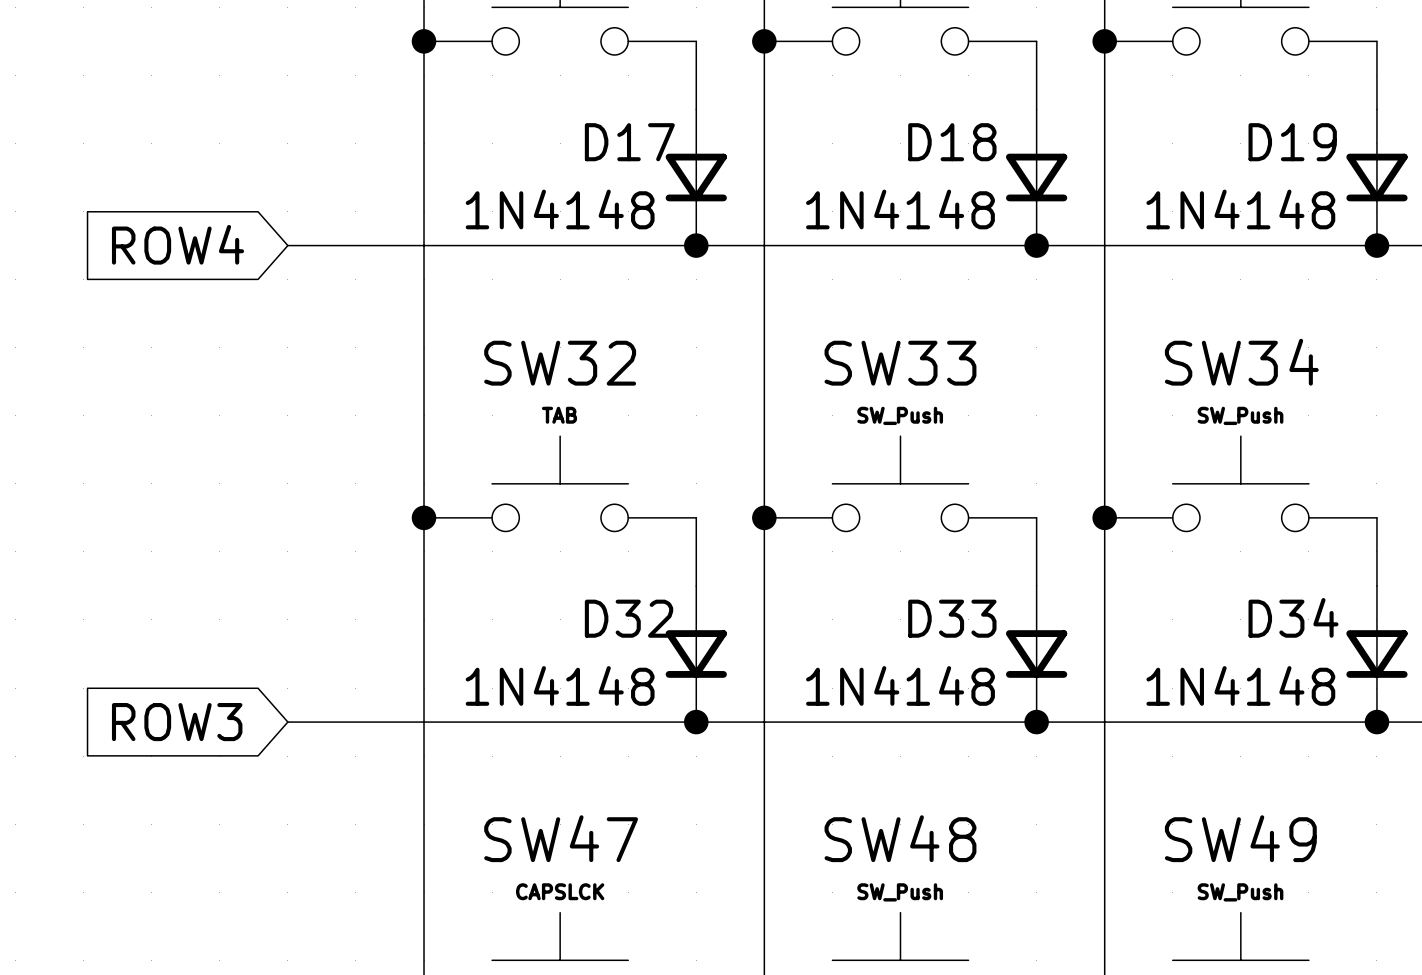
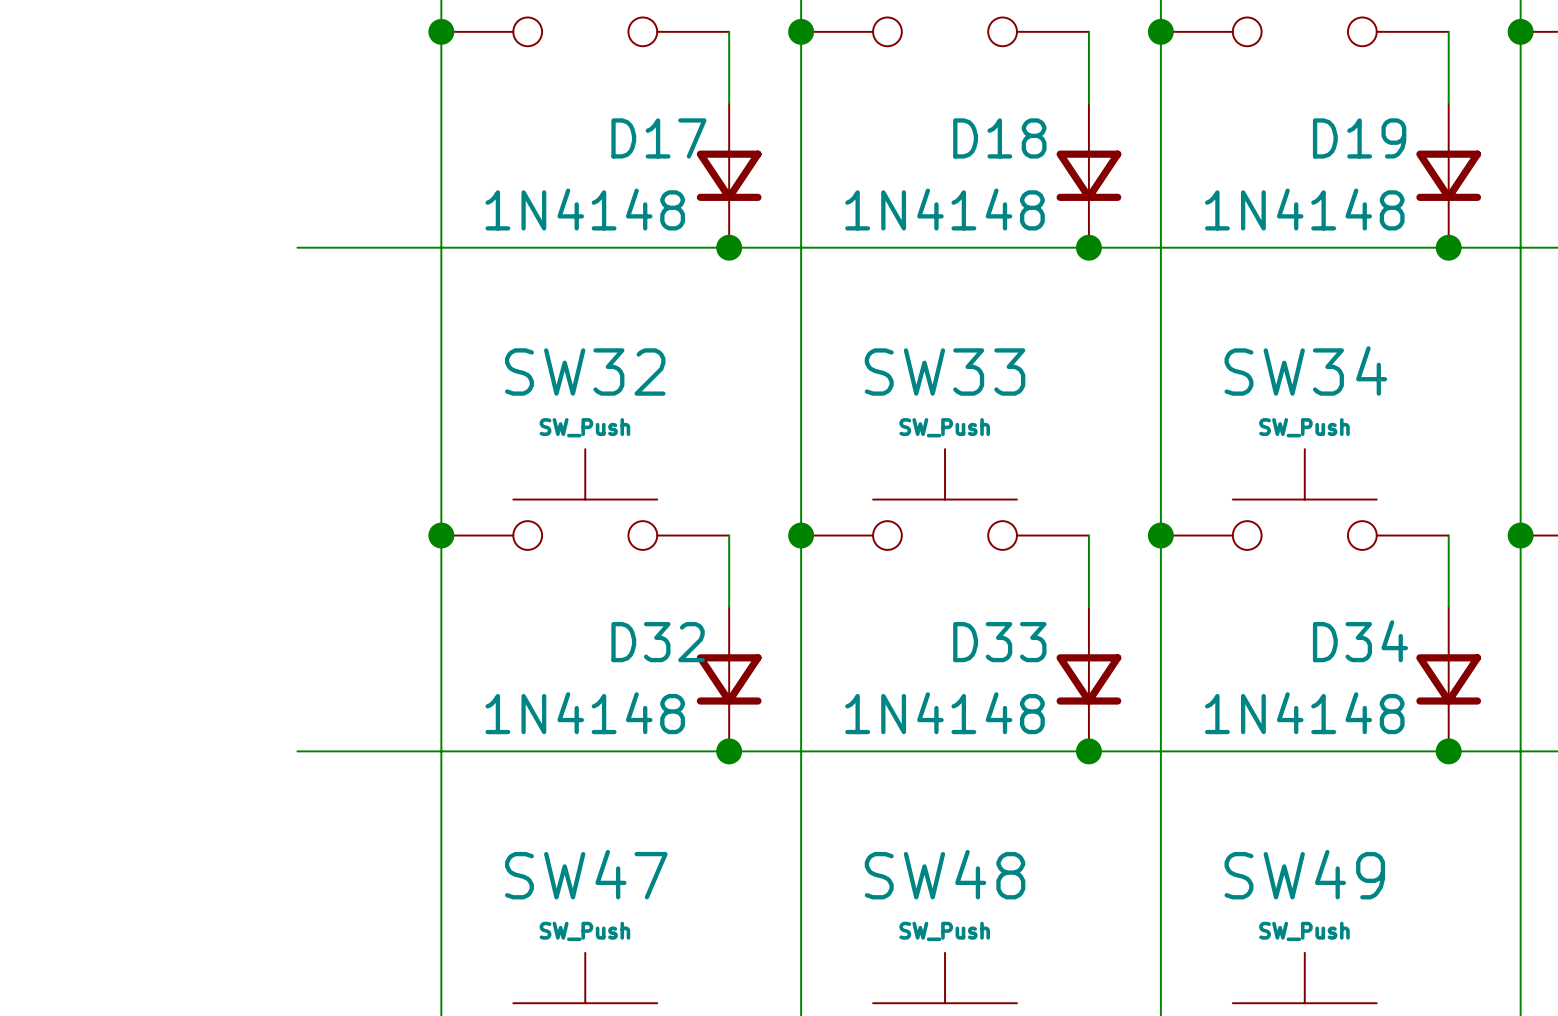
global label: ROW4 (178, 244) -> none
SW32 value: TAB (559, 415) -> SW_Push (584, 427)
global label: ROW3 (177, 722) -> none
SW47 value: CAPSLCK (560, 891) -> SW_Push (584, 931)

